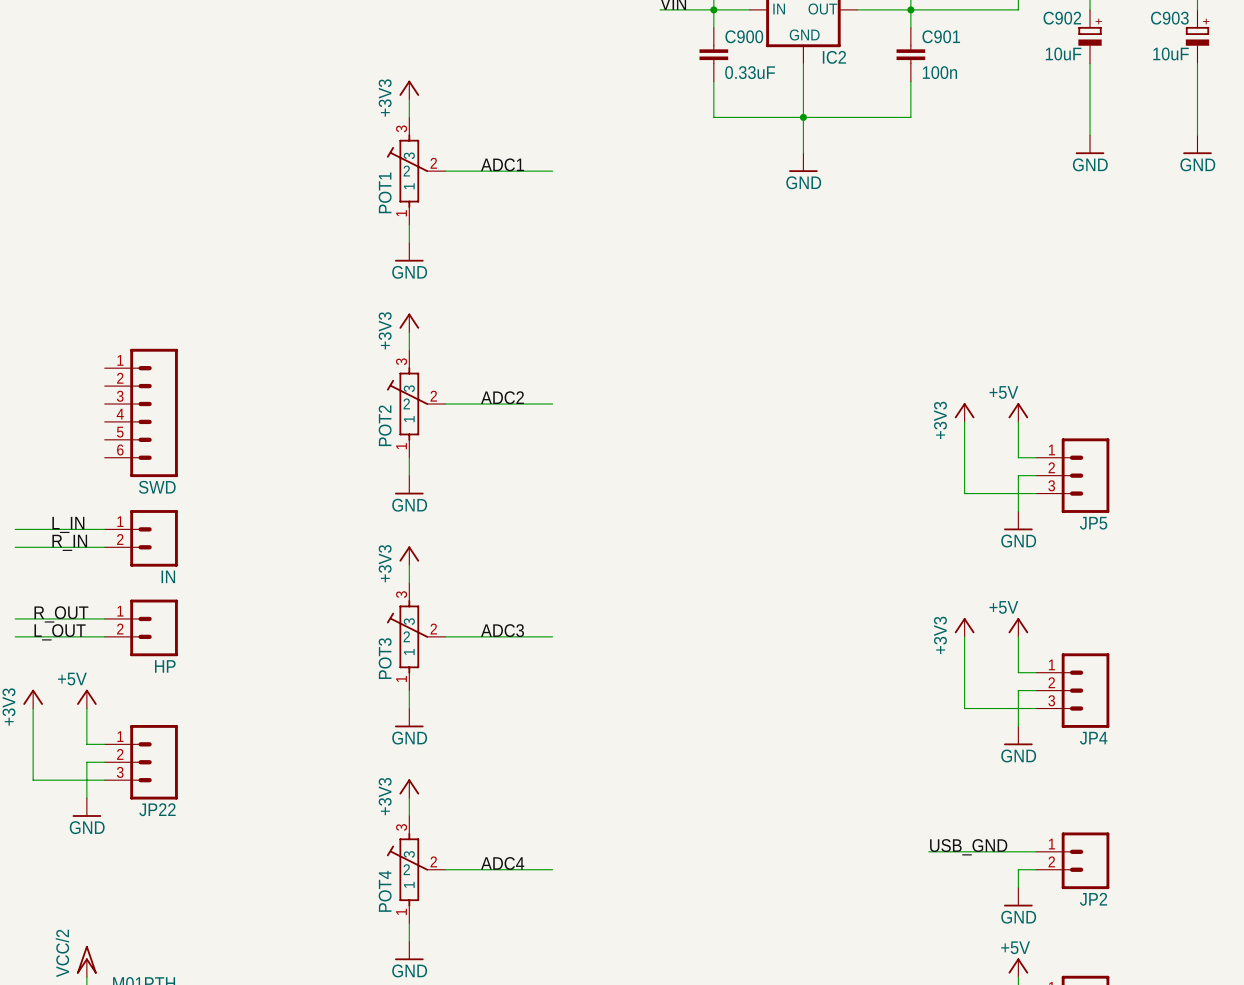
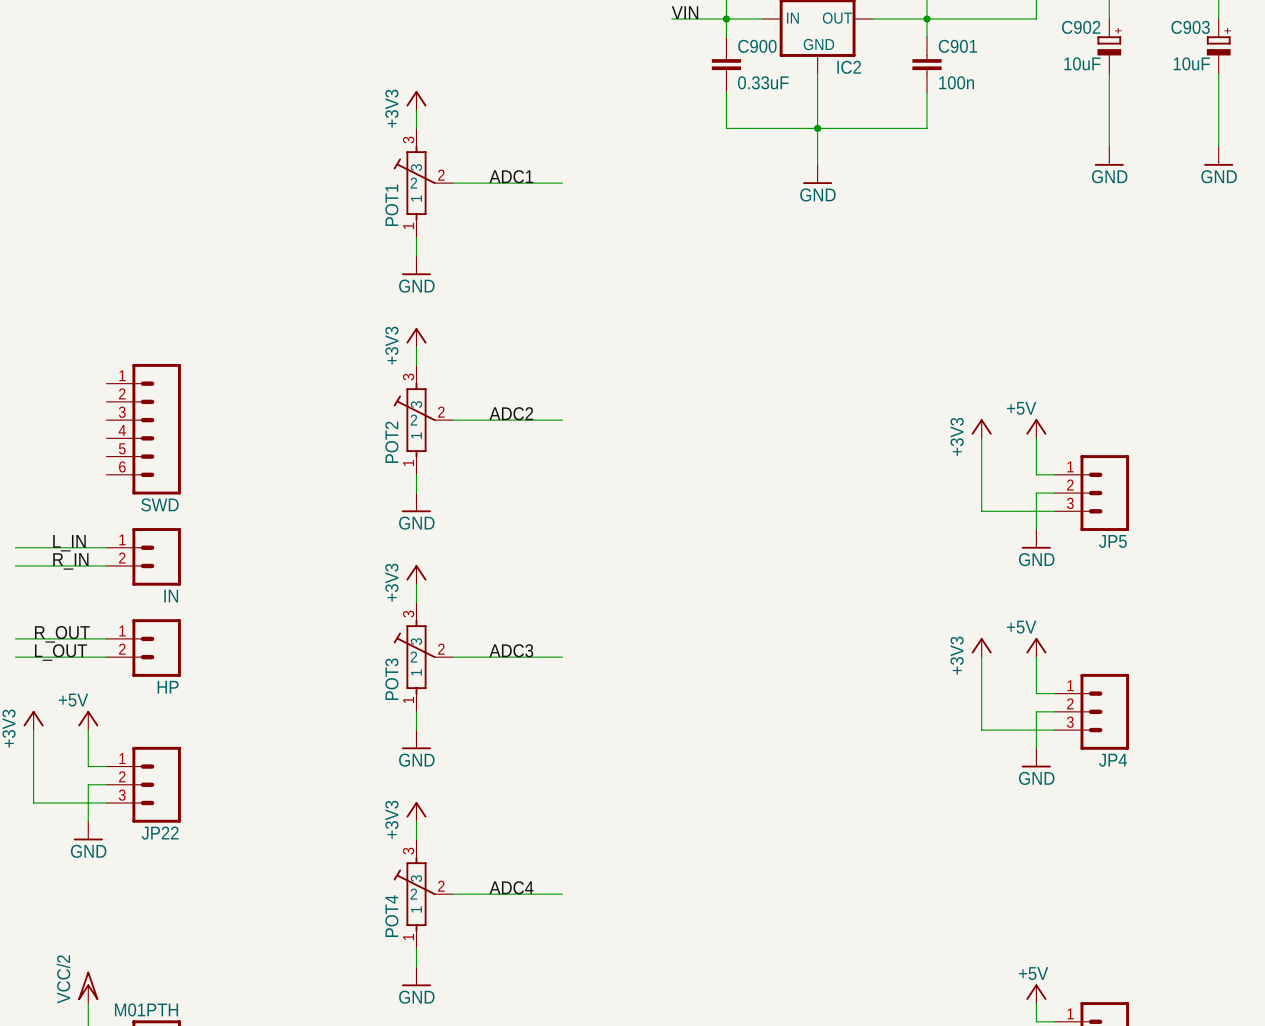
label: USB_GND (968, 847) -> none
wire: (928, 851) (1036, 851) -> none
JP2: (1072, 860) -> none
wire: (1036, 869) (1018, 869) (1018, 887) -> none
power symbol: GND (1018, 897) -> none

